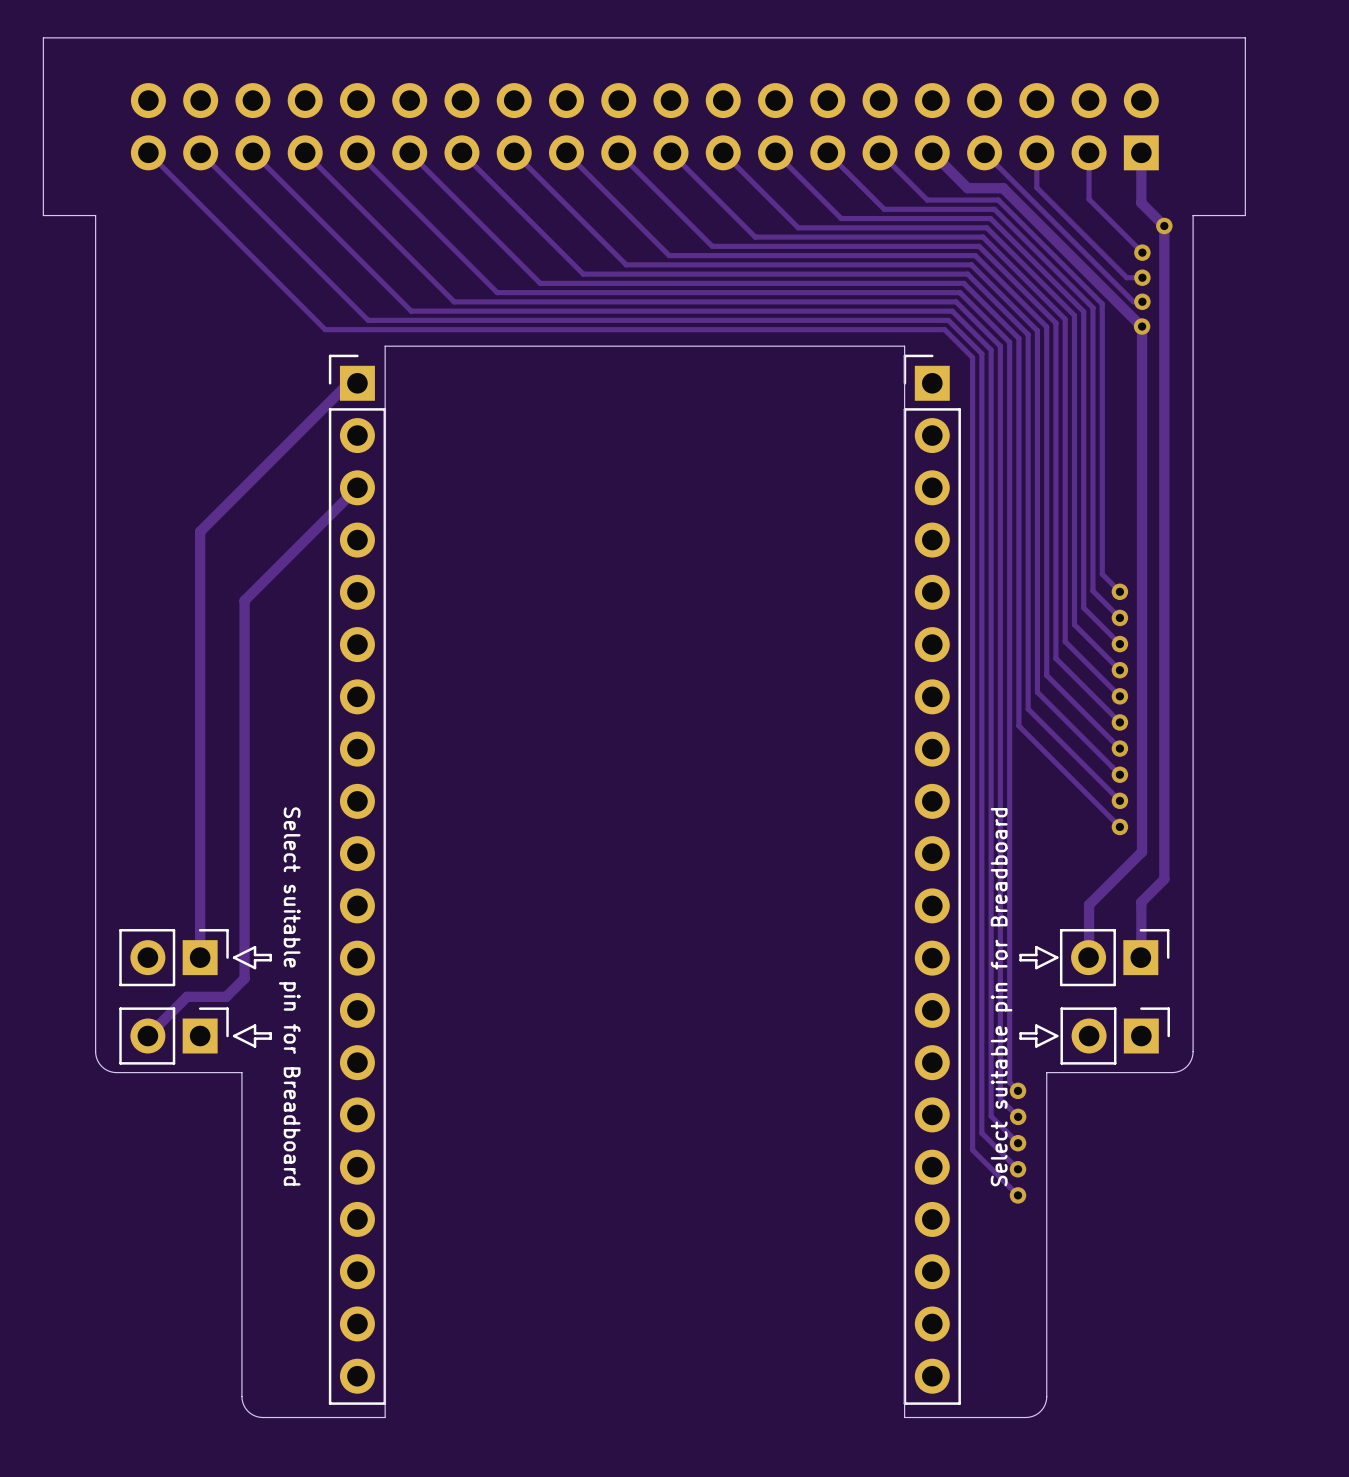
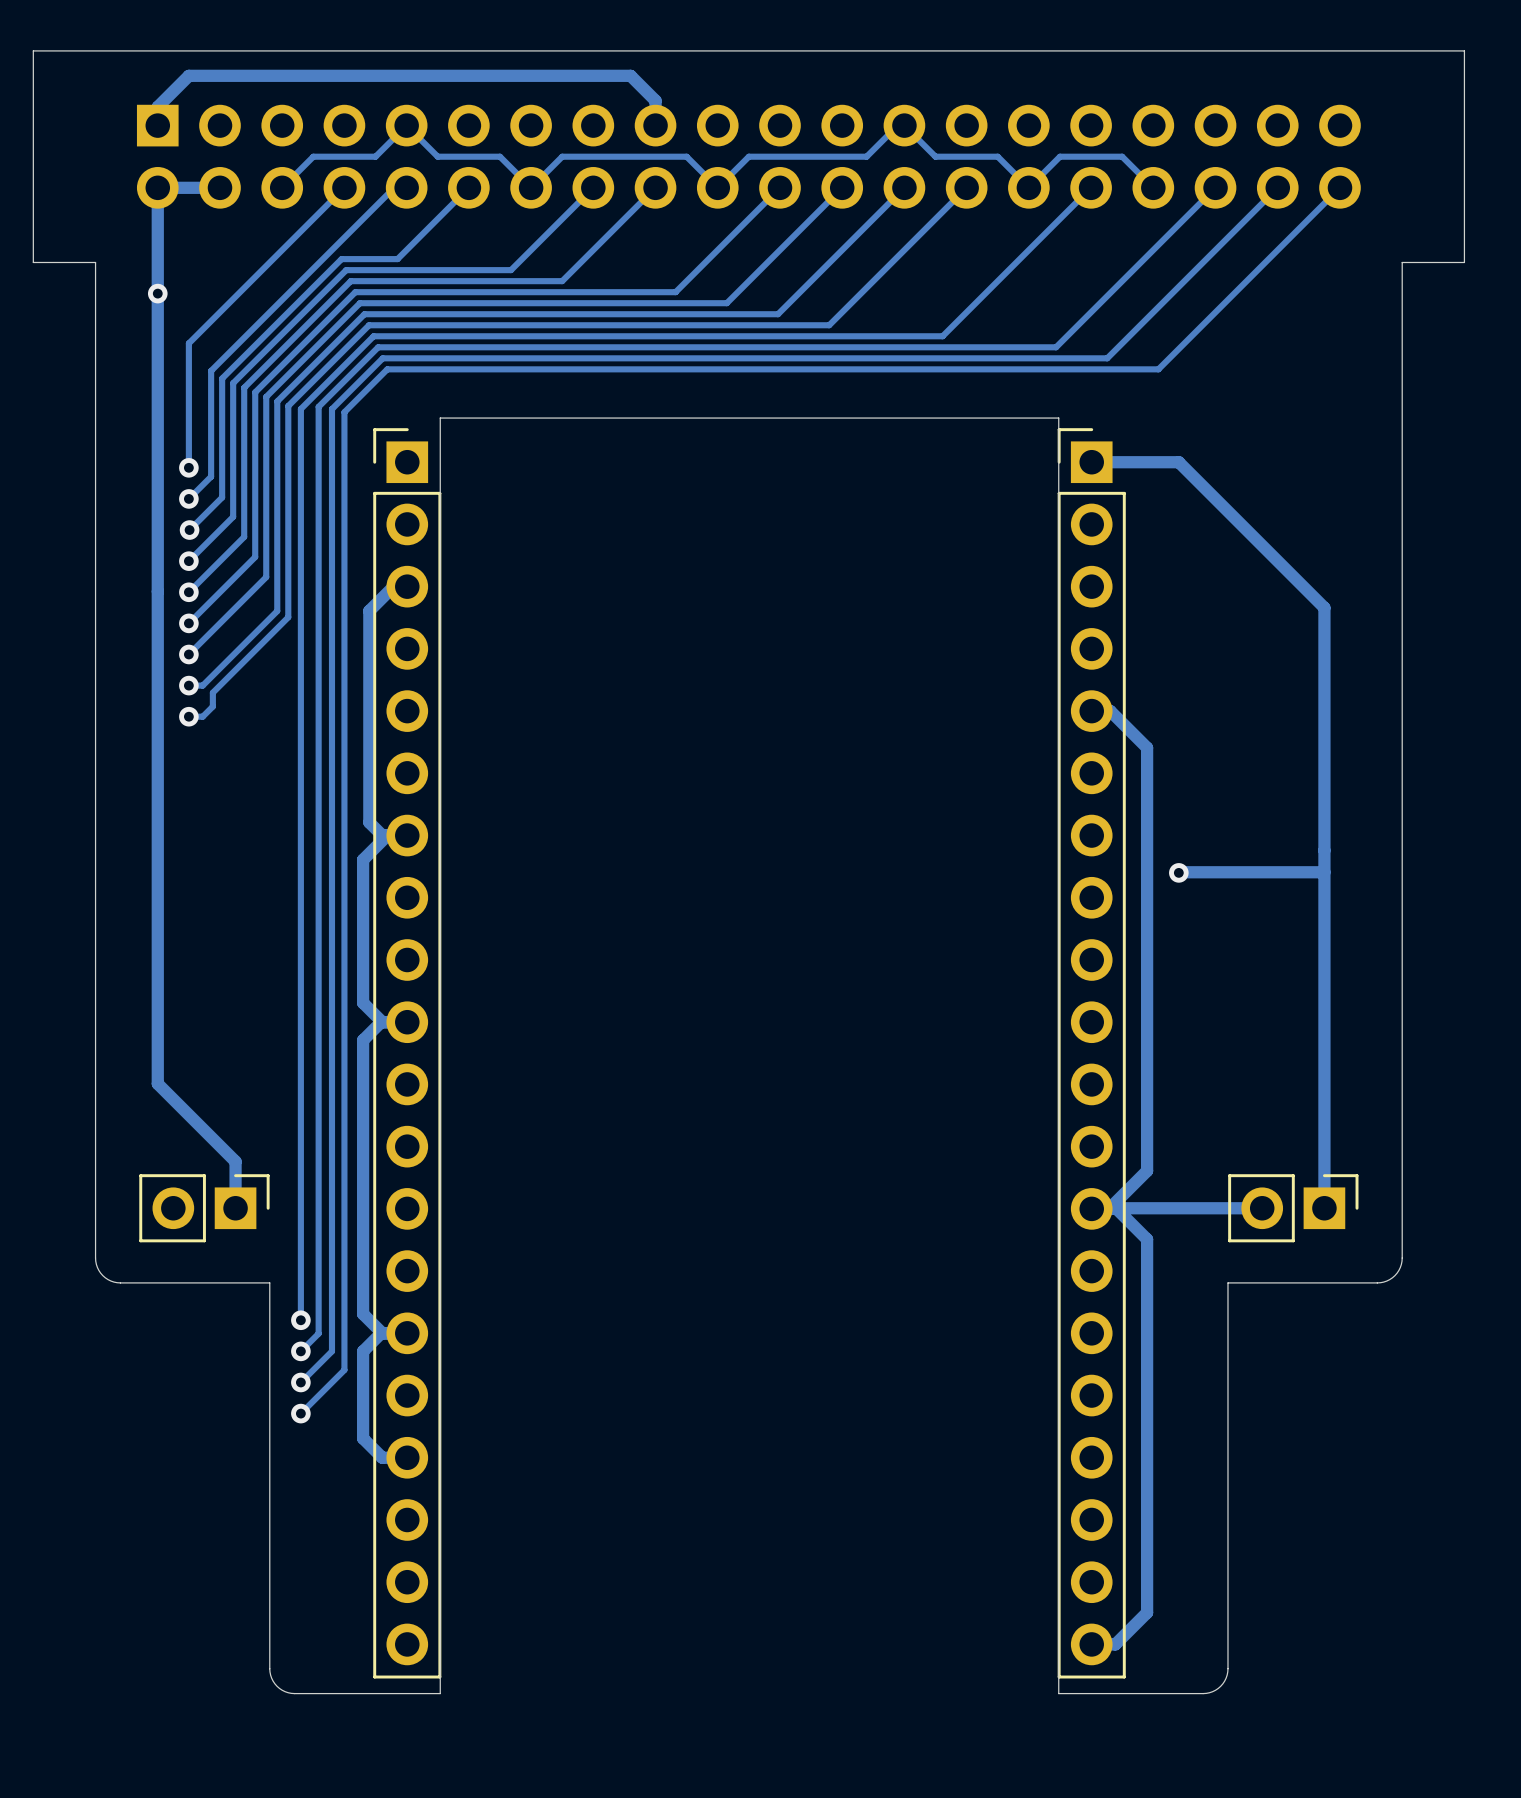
track: none -> (655, 125) (655, 100) (630, 75) (188, 75) (157, 106) (157, 125)
part rotation: 0° (644, 126) -> 180° (748, 156)
track: (148, 152) (325, 329) (944, 329) (972, 357) (972, 1150) (1018, 1195) -> none
track: (200, 152) (368, 320) (948, 320) (981, 353) (981, 1133) (1018, 1169) -> (220, 187) (157, 187) (157, 1083) (235, 1161) (235, 1208)
track: (252, 152) (411, 311) (952, 311) (991, 349) (991, 1116) (1018, 1143) -> none
track: (305, 152) (454, 301) (956, 301) (1000, 346) (1000, 1099) (1018, 1116) -> (344, 187) (188, 343) (188, 467)
track: (357, 152) (497, 292) (959, 292) (1009, 342) (1009, 1082) (1018, 1090) -> (406, 187) (394, 187) (211, 370) (211, 476) (188, 498)
track: (409, 152) (540, 283) (963, 283) (1018, 338) (1018, 725) (1119, 826) -> (468, 187) (397, 259) (341, 259) (222, 378) (222, 497) (189, 530)
track: (461, 152) (583, 274) (967, 274) (1028, 334) (1028, 709) (1119, 800) -> none
track: (514, 152) (626, 264) (971, 264) (1037, 330) (1037, 692) (1119, 774) -> (593, 187) (511, 270) (346, 270) (233, 383) (233, 516) (188, 561)
track: (566, 152) (669, 255) (975, 255) (1046, 326) (1046, 675) (1119, 748) -> (655, 187) (562, 281) (350, 281) (244, 387) (244, 536) (188, 592)
track: (618, 152) (712, 246) (979, 246) (1055, 323) (1055, 658) (1119, 722) -> none
track: (671, 152) (755, 237) (982, 237) (1065, 319) (1065, 641) (1119, 696) -> (779, 187) (675, 292) (355, 292) (255, 392) (255, 557) (188, 623)
track: (723, 152) (798, 227) (986, 227) (1074, 315) (1074, 624) (1119, 670) -> (842, 187) (726, 303) (359, 303) (266, 396) (266, 577) (188, 654)
track: (775, 152) (841, 218) (990, 218) (1083, 311) (1083, 607) (1119, 644) -> (904, 187) (778, 314) (364, 314) (277, 401) (277, 611) (202, 685) (188, 685)
track: (827, 152) (884, 209) (994, 209) (1092, 307) (1092, 591) (1119, 617) -> (966, 187) (829, 325) (369, 325) (288, 406) (288, 617) (212, 692) (212, 706) (202, 716) (188, 716)
track: (880, 152) (927, 200) (998, 200) (1102, 303) (1102, 574) (1119, 591) -> none
track: (932, 152) (967, 188) (1003, 188) (1142, 326) (1142, 851) (1089, 904) (1088, 957) -> (1091, 187) (942, 336) (373, 336) (300, 409) (300, 1320)
track: (984, 152) (1133, 301) (1142, 301) -> (1153, 187) (1122, 156) (1059, 156) (1028, 187) (997, 156) (935, 156) (904, 125) (897, 125) (866, 156) (748, 156) (717, 187) (686, 156) (562, 156) (531, 187) (499, 156) (437, 156) (406, 125) (375, 156) (313, 156) (282, 187)
track: (1036, 152) (1036, 187) (1126, 277) (1142, 277) -> (1215, 187) (1056, 347) (378, 347) (318, 406) (318, 1333) (300, 1351)
track: (1089, 152) (1089, 199) (1142, 252) -> (1277, 187) (1107, 358) (382, 358) (332, 409) (332, 1351) (300, 1382)
track: (1141, 152) (1141, 203) (1164, 225) (1164, 879) (1141, 902) (1140, 957) -> (1339, 187) (1158, 369) (387, 369) (344, 412) (344, 1370) (300, 1413)
via: (1164, 225) -> none
via: none -> (157, 293)
via: (1142, 252) -> none
via: (1142, 277) -> none
via: (1142, 301) -> none
via: (1142, 326) -> none
track: (357, 383) (348, 383) (200, 531) (200, 957) -> none
track: none -> (1091, 462) (1178, 462) (1324, 607) (1324, 1208)
via: none -> (188, 467)
via: none -> (188, 498)
via: none -> (189, 530)
via: none -> (188, 561)
track: (357, 487) (244, 600) (244, 978) (226, 996) (187, 996) (147, 1036) -> (407, 586) (393, 586) (369, 610) (369, 822) (382, 835) (407, 835)
via: none -> (188, 592)
via: none -> (188, 623)
via: none -> (188, 654)
via: none -> (188, 685)
via: (1119, 591) -> none
track: none -> (1091, 711) (1110, 711) (1147, 747) (1147, 1170) (1109, 1208)
via: none -> (188, 716)
via: (1119, 617) -> none
via: (1119, 644) -> none
via: (1119, 670) -> none
track: none -> (387, 835) (363, 859) (363, 1002) (382, 1022)
via: (1119, 696) -> none
via: (1119, 722) -> none
track: none -> (1324, 872) (1178, 872)
via: none -> (1178, 872)
via: (1119, 748) -> none
via: (1119, 774) -> none
via: (1119, 800) -> none
via: (1119, 826) -> none
track: none -> (407, 1022) (381, 1022) (363, 1040) (363, 1314) (382, 1333)
line: (255, 947) (255, 955) (270, 955) (270, 960) (255, 960) (255, 968) (234, 957) (255, 947) -> none
line: (1036, 947) (1036, 955) (1020, 955) (1020, 960) (1036, 960) (1036, 968) (1057, 957) (1036, 947) -> none
part: (174, 957) -> none
part: (1114, 957) -> none
text: Select suitable pin for Breadboard (289, 996) -> none
text: Select suitable pin for Breadboard (1001, 997) -> none
part: none -> (204, 1208)
track: none -> (1262, 1208) (1091, 1208) (1116, 1208) (1147, 1239) (1147, 1612) (1115, 1644) (1091, 1644)
part: none -> (1293, 1208)
line: (255, 1025) (255, 1033) (270, 1033) (270, 1038) (255, 1038) (255, 1046) (234, 1036) (255, 1025) -> none
line: (1036, 1025) (1036, 1033) (1020, 1033) (1020, 1038) (1036, 1038) (1036, 1046) (1057, 1036) (1036, 1025) -> none
part: (174, 1036) -> none
part: (1115, 1036) -> none
via: (1018, 1090) -> none
via: none -> (300, 1320)
track: none -> (407, 1333) (381, 1333) (363, 1351) (363, 1438) (382, 1457) (407, 1457)
via: (1018, 1116) -> none
via: none -> (300, 1351)
via: (1018, 1143) -> none
via: none -> (300, 1382)
via: (1018, 1169) -> none
via: none -> (300, 1413)
via: (1018, 1195) -> none

